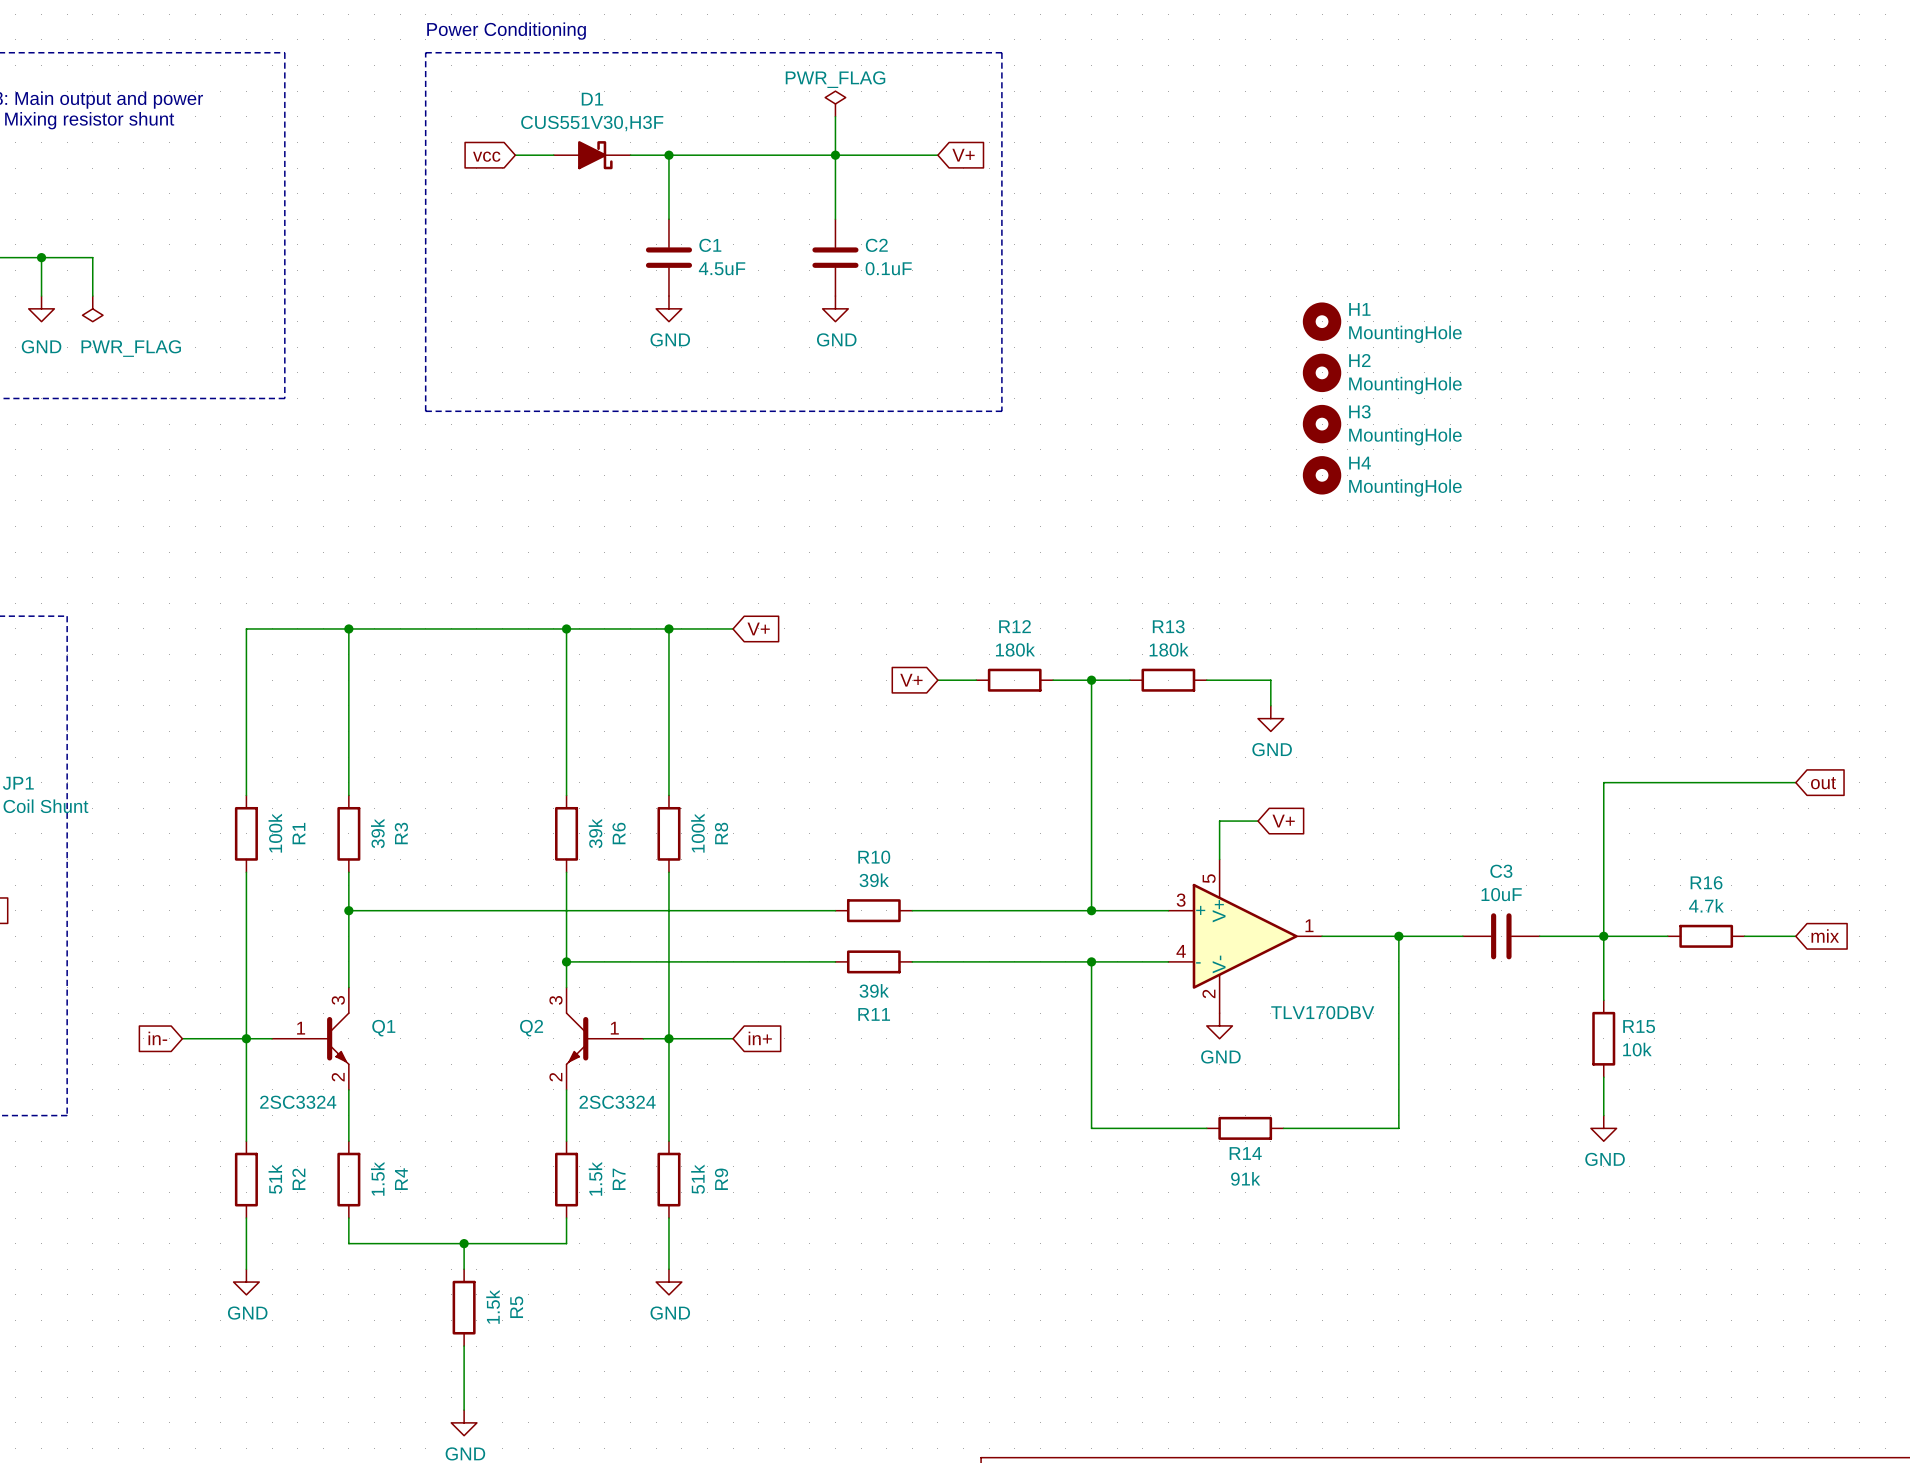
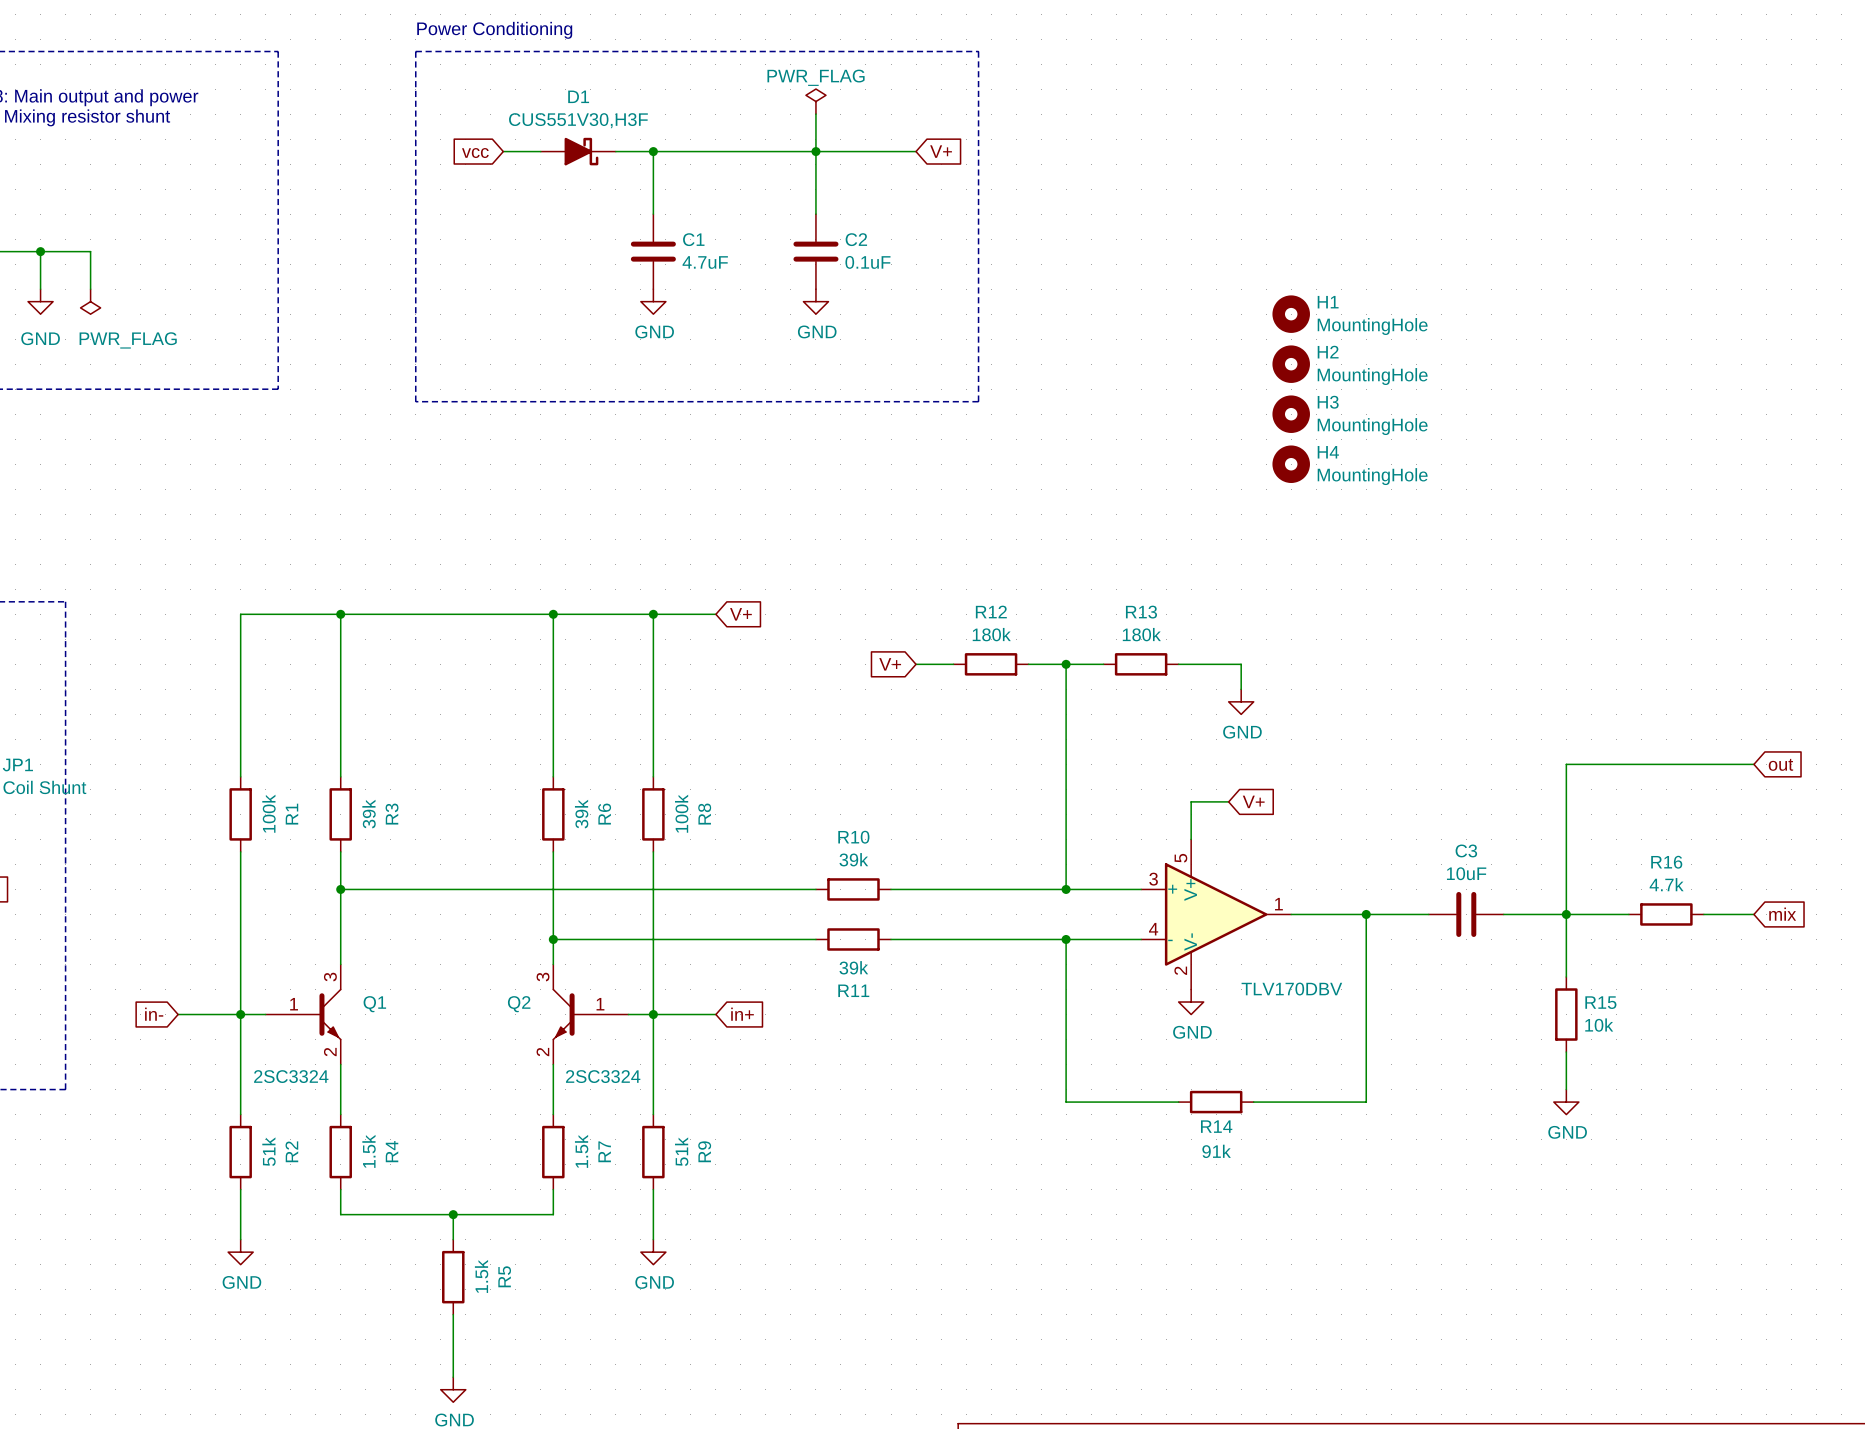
C1 value: 4.5uF (722, 268) -> 4.7uF (705, 262)

